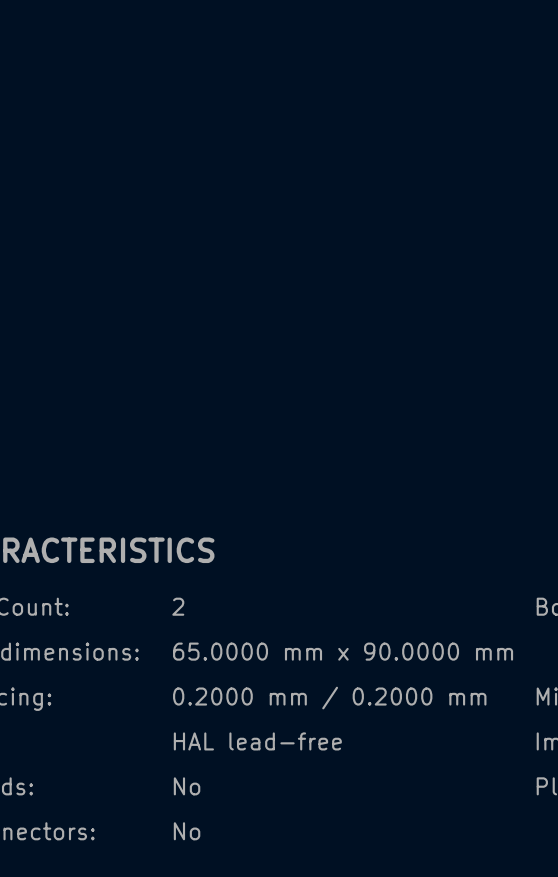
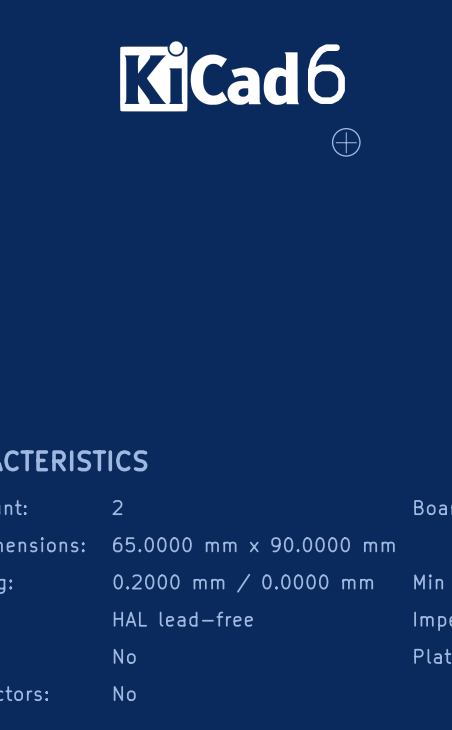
drawing: none -> [120, 41, 300, 112]
text: none -> 6 (326, 74)
drawing: none -> [331, 127, 361, 157]
text: none -> + (346, 142)
text: 0.2000 mm / 0.2000 mm (329, 698) -> 0.2000 mm / 0.0000 mm (243, 583)

